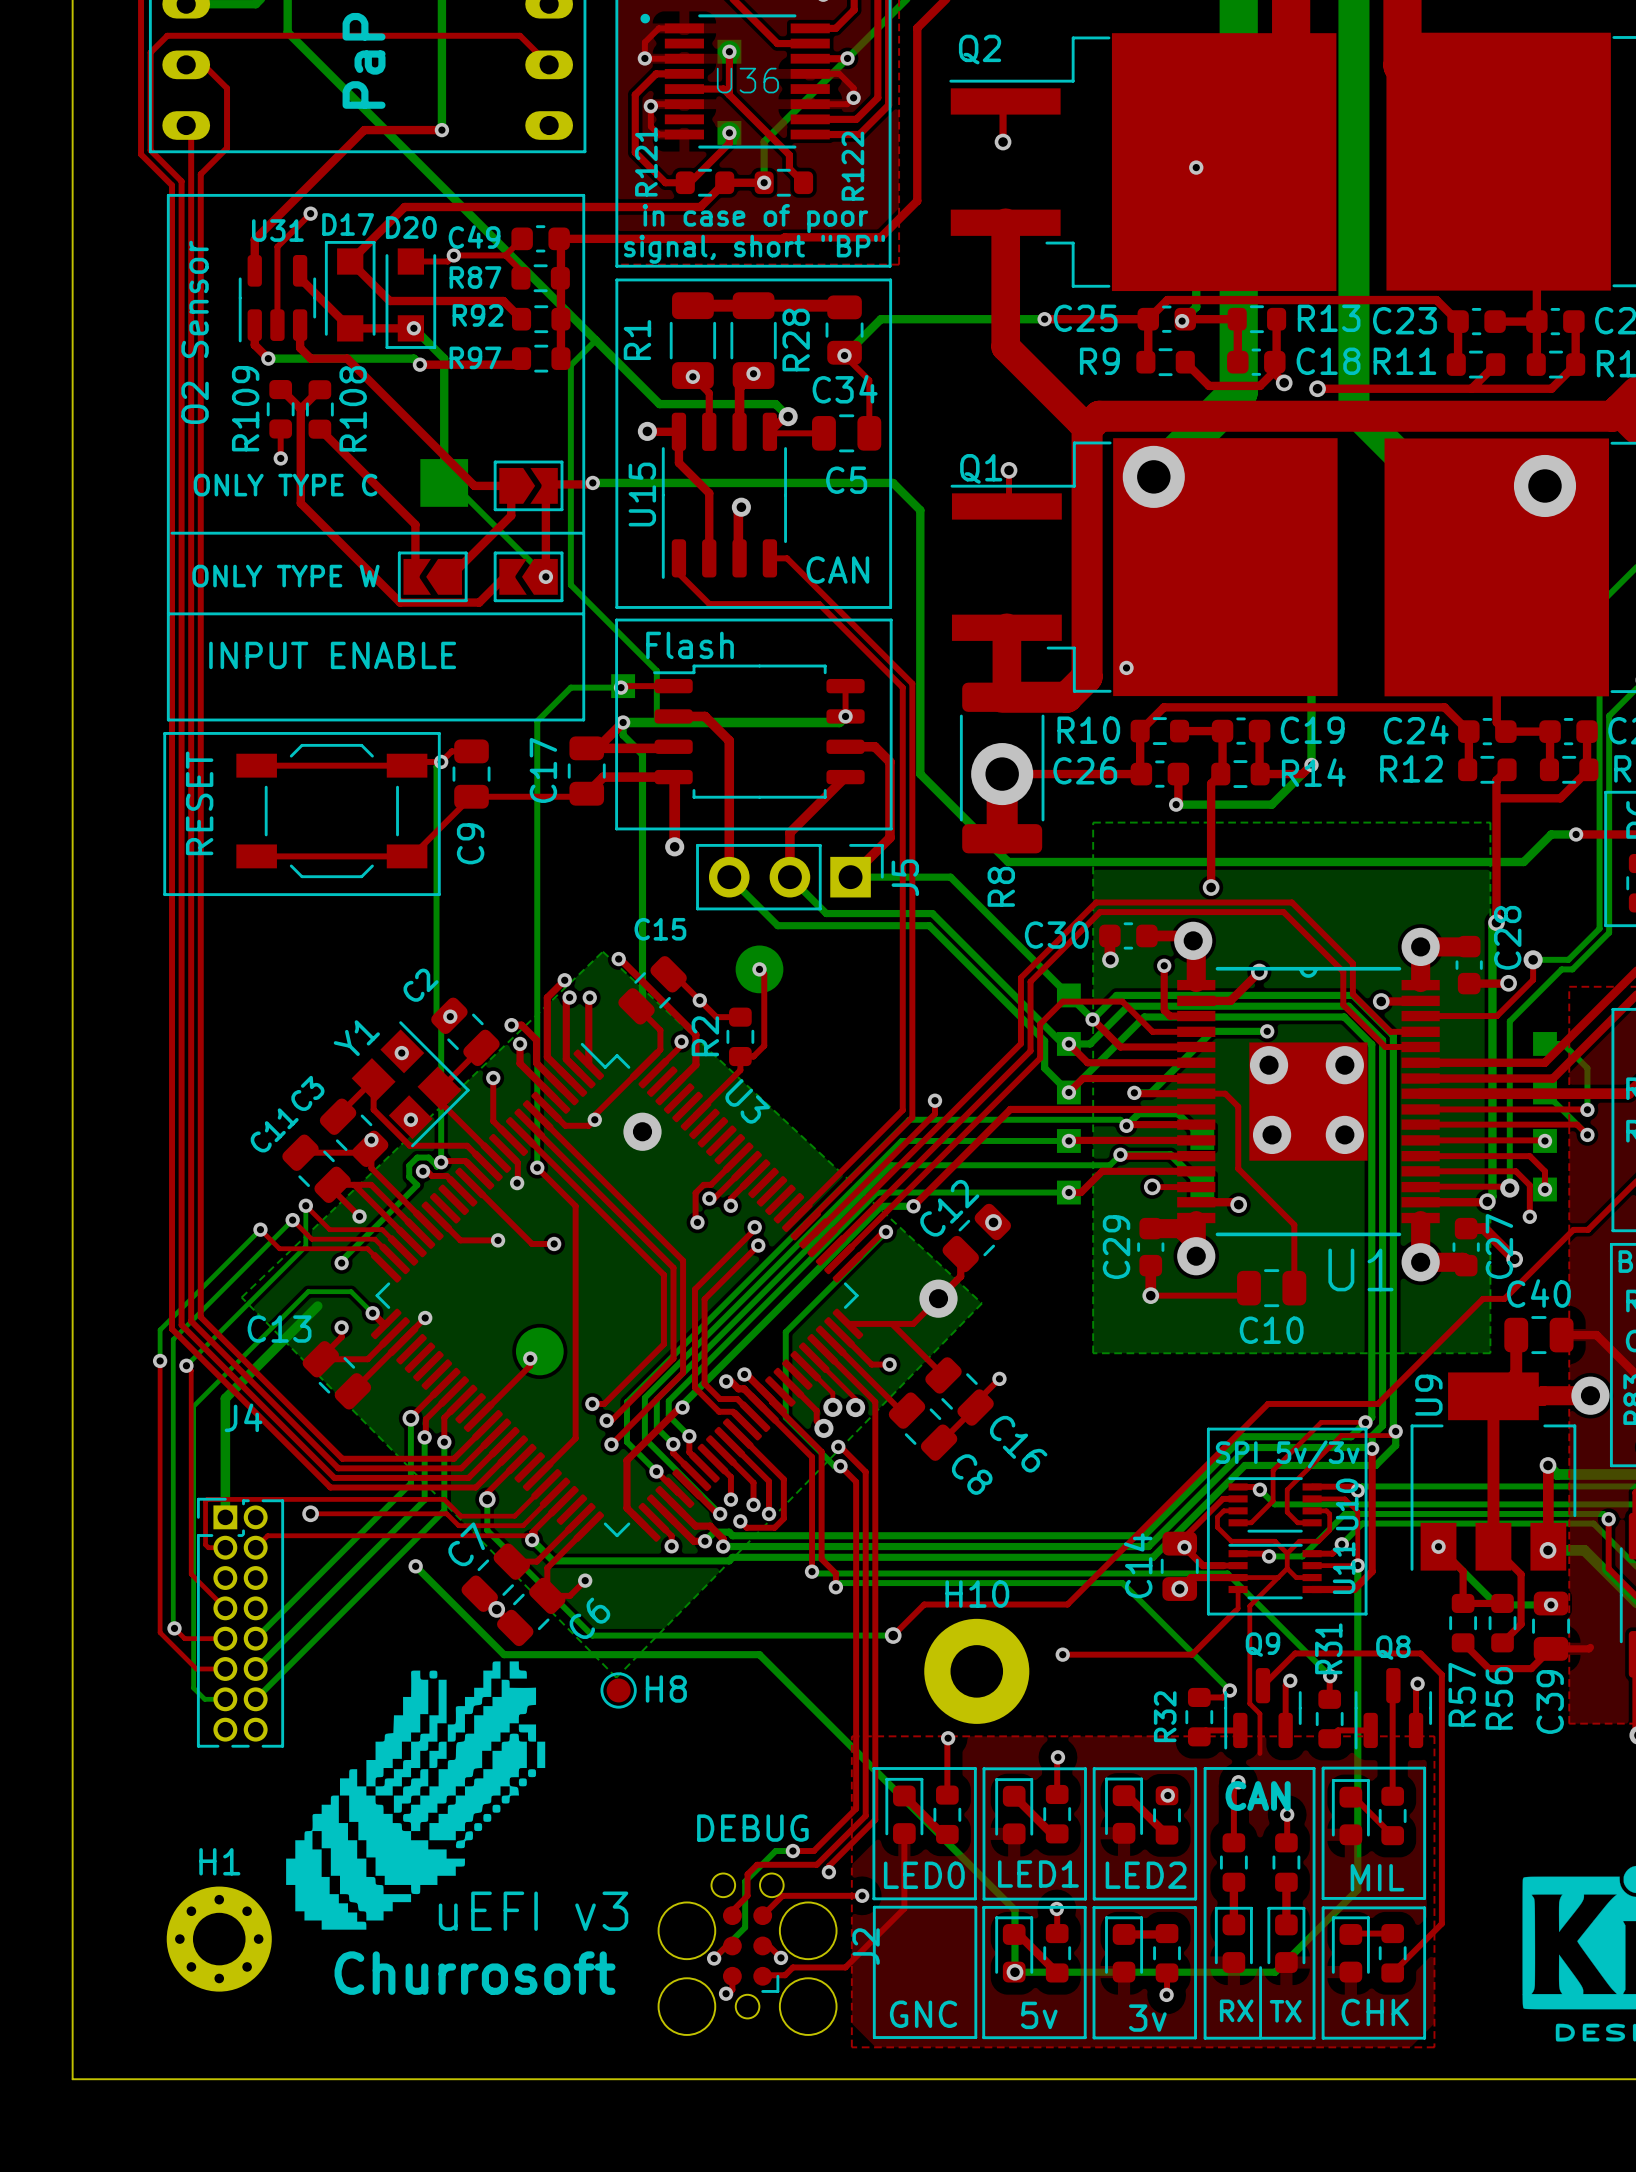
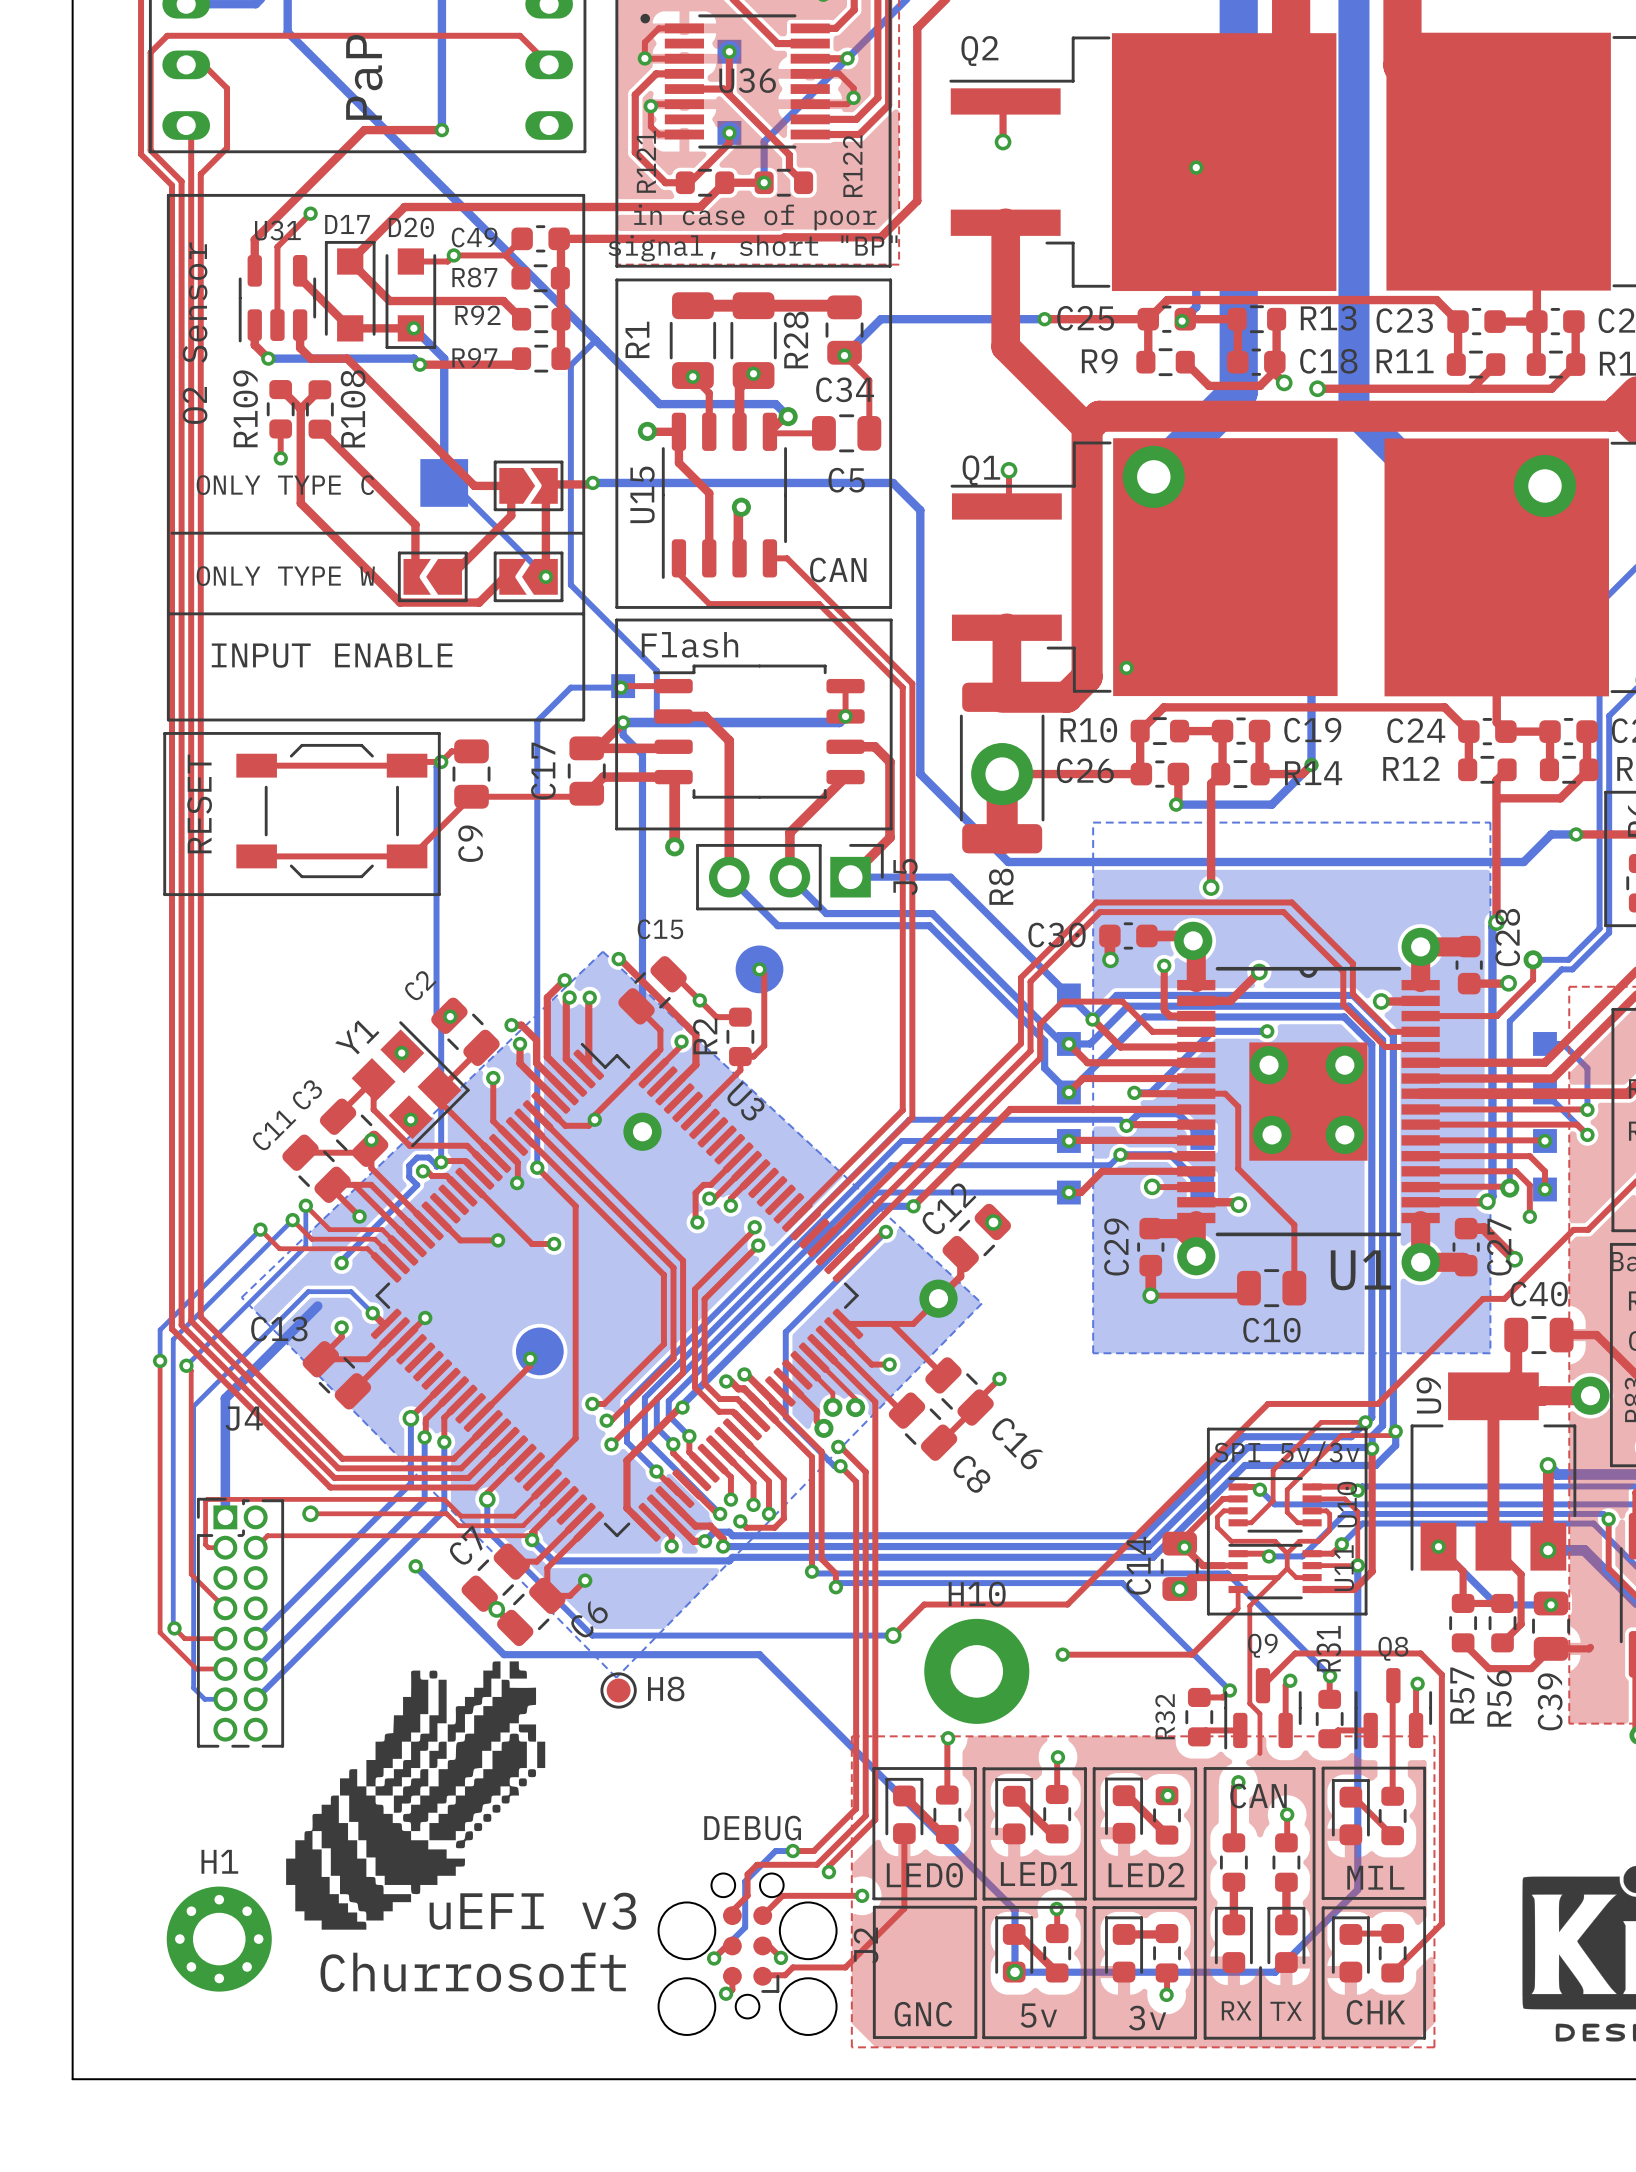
top track: (934, 1100) (934, 1113) (814, 1233) -> none
via: (934, 1100) -> none

